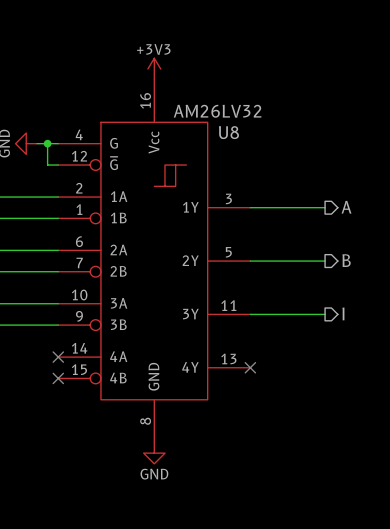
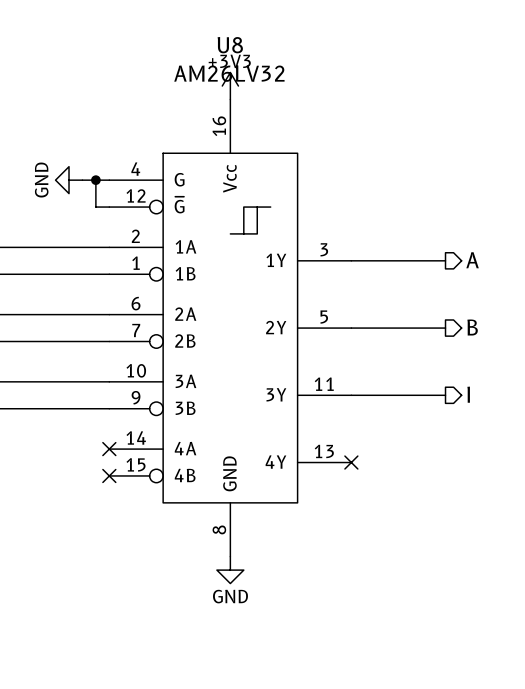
U8 value position: AM26LV32 (217, 111) -> AM26LV32 (229, 73)
U8 name position: U8 (228, 132) -> U8 (230, 45)

